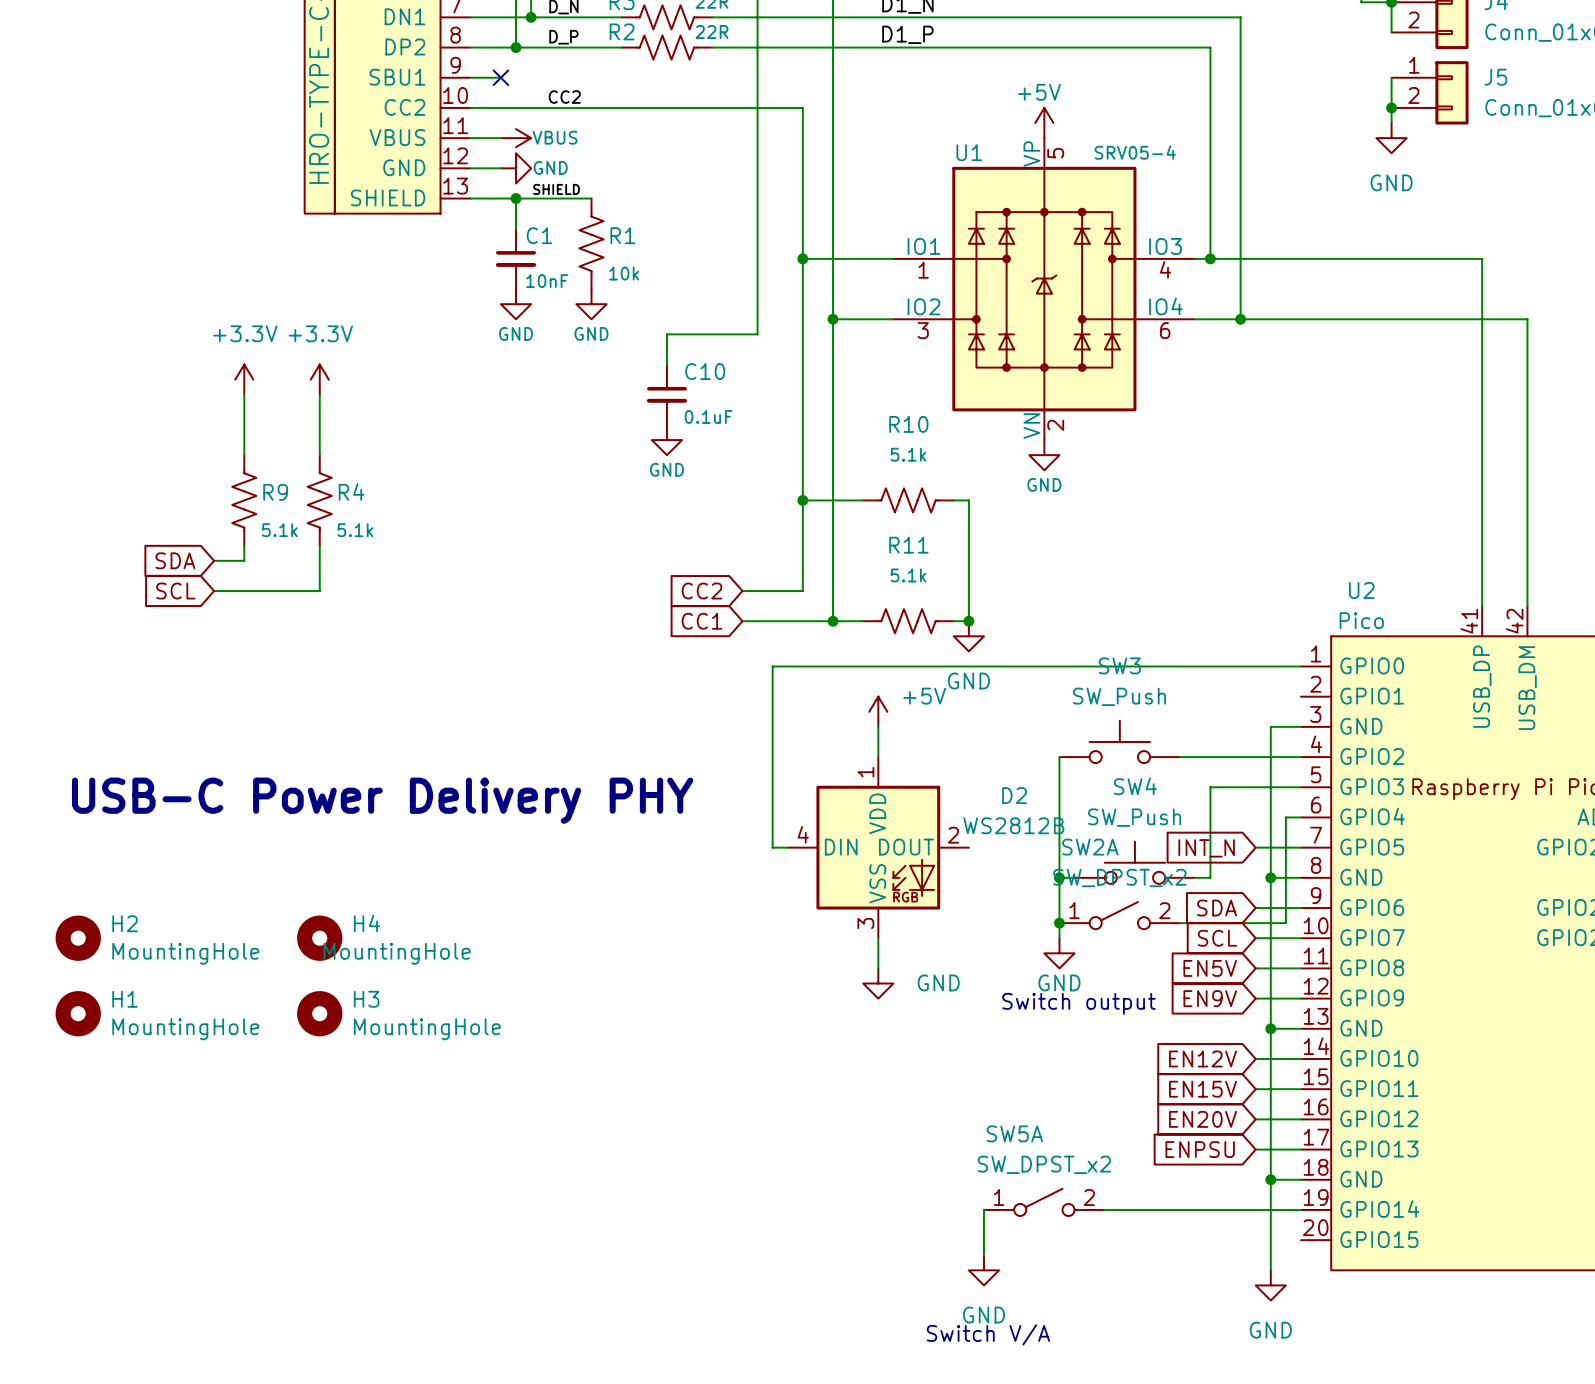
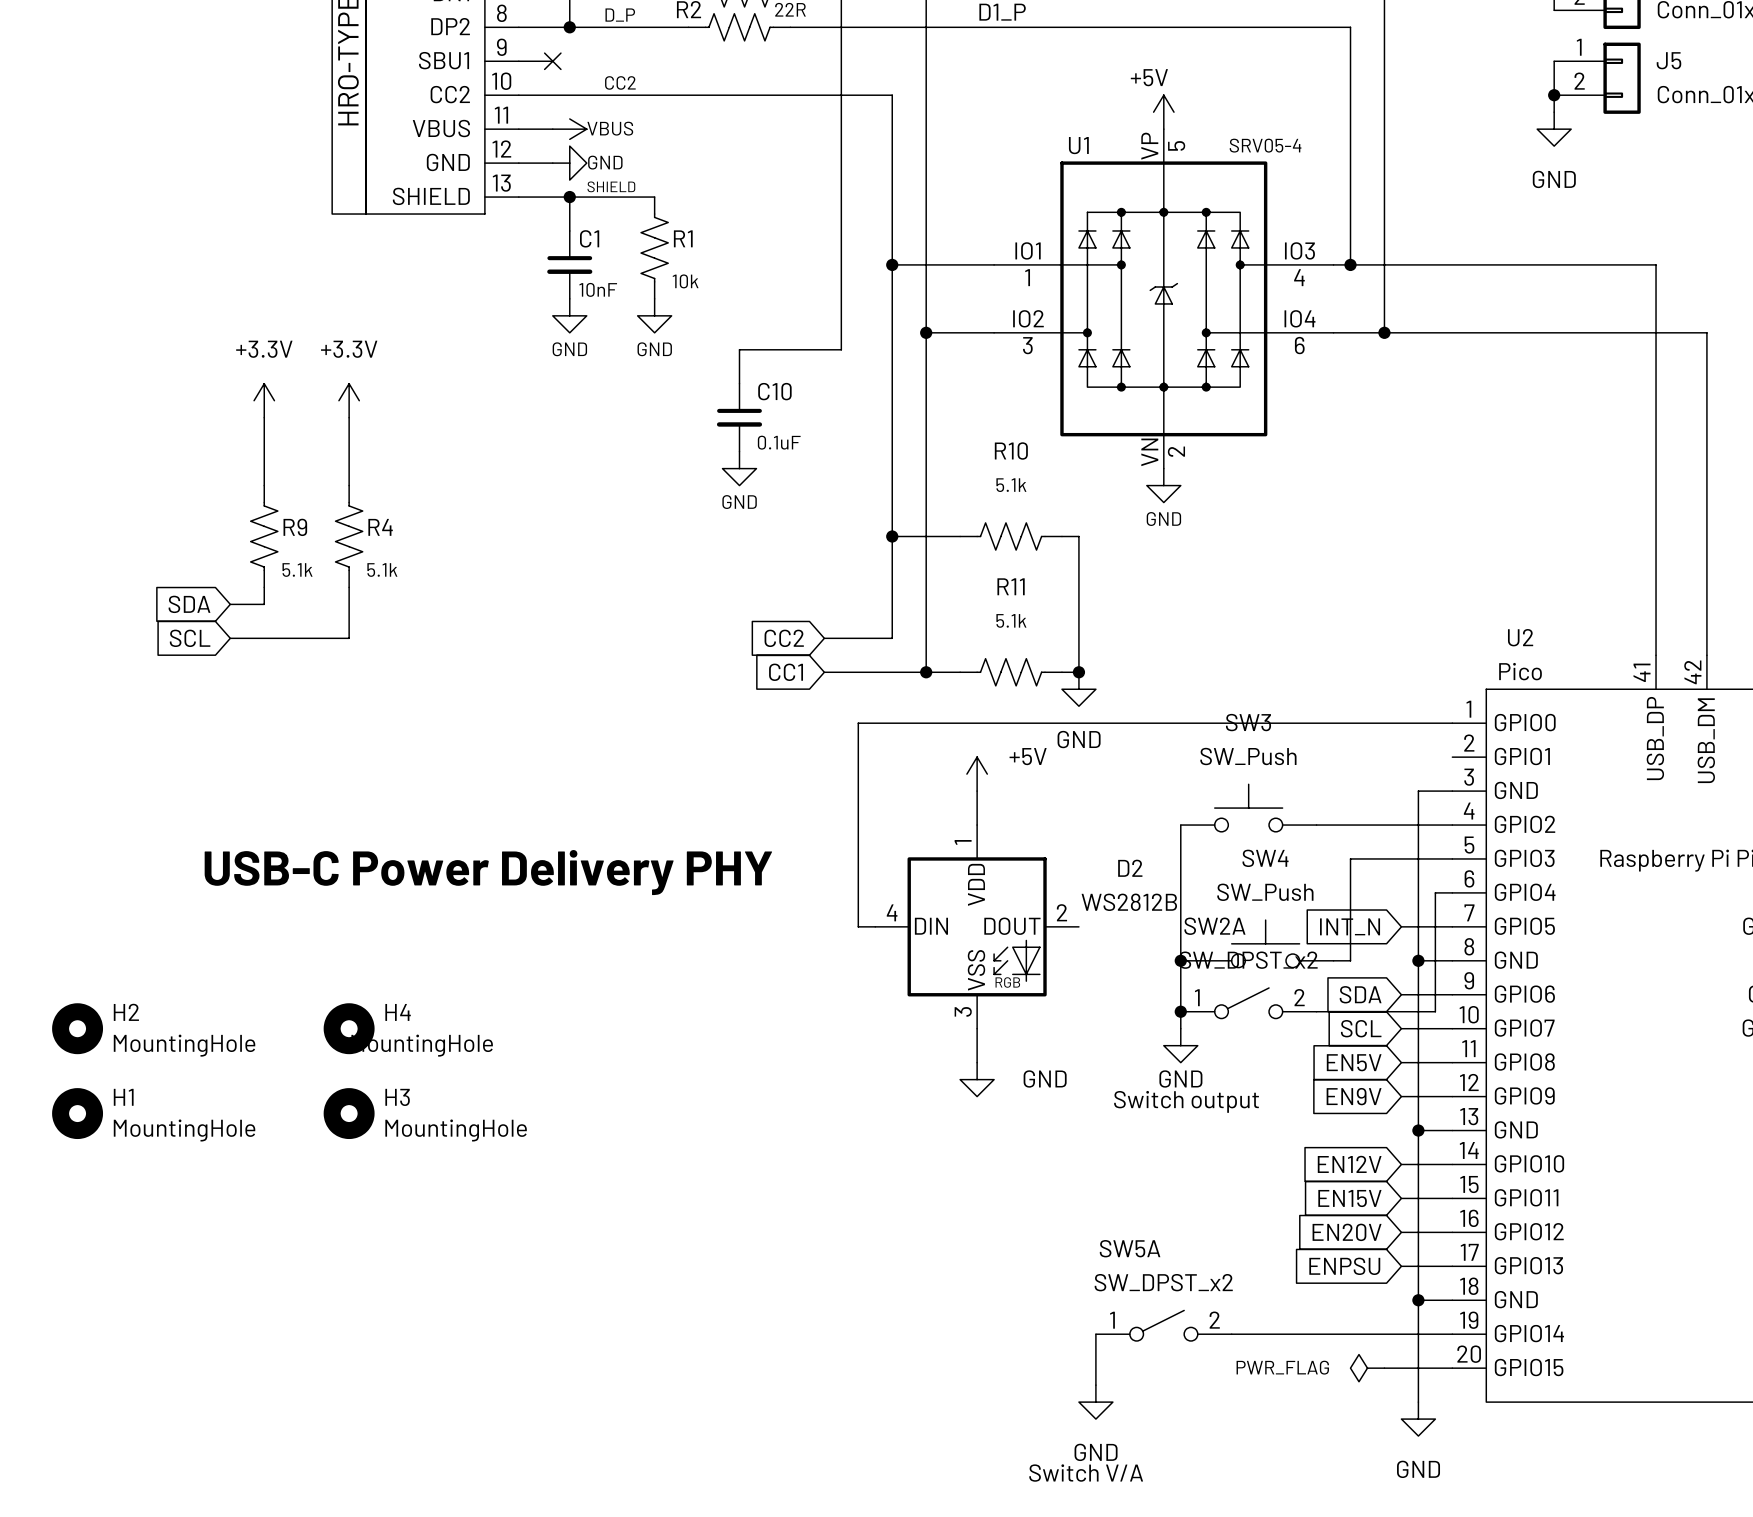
power symbol: none -> PWR_FLAG (1367, 1368)
wire: none -> (1384, 1368) (1452, 1368)

